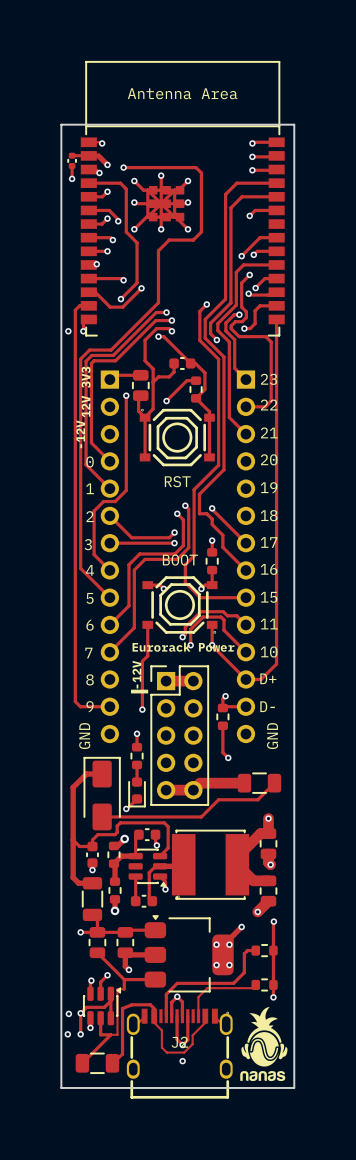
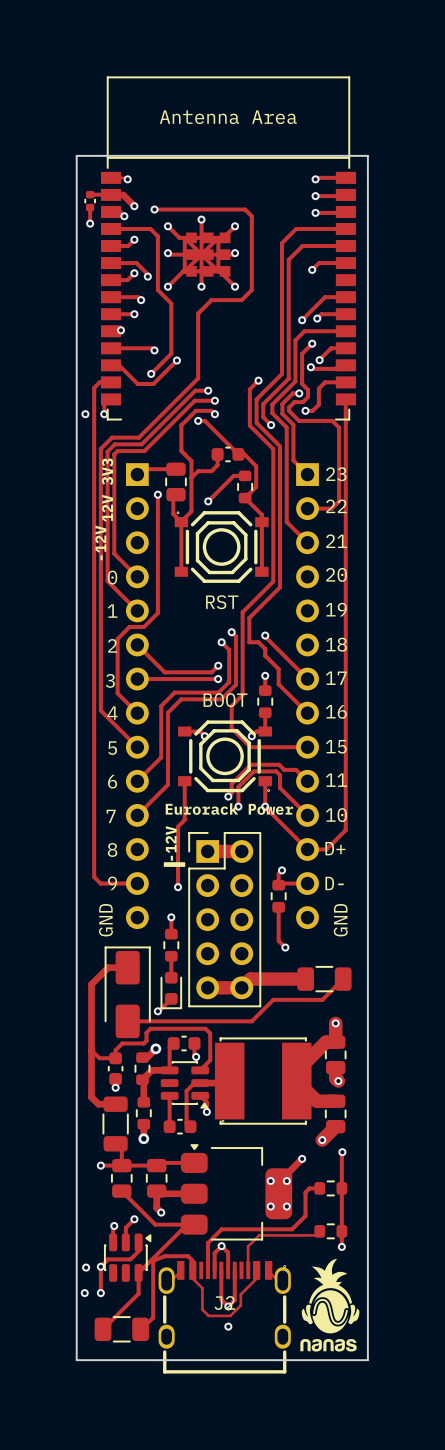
track: (124, 979) (124, 989) (117, 989) (117, 1034) (100, 1034) (100, 1018) -> none
track: none -> (186, 1224) (138, 1272) (138, 1293)
track: (110, 1000) (110, 1012) -> none
via: (90, 1027) -> none

